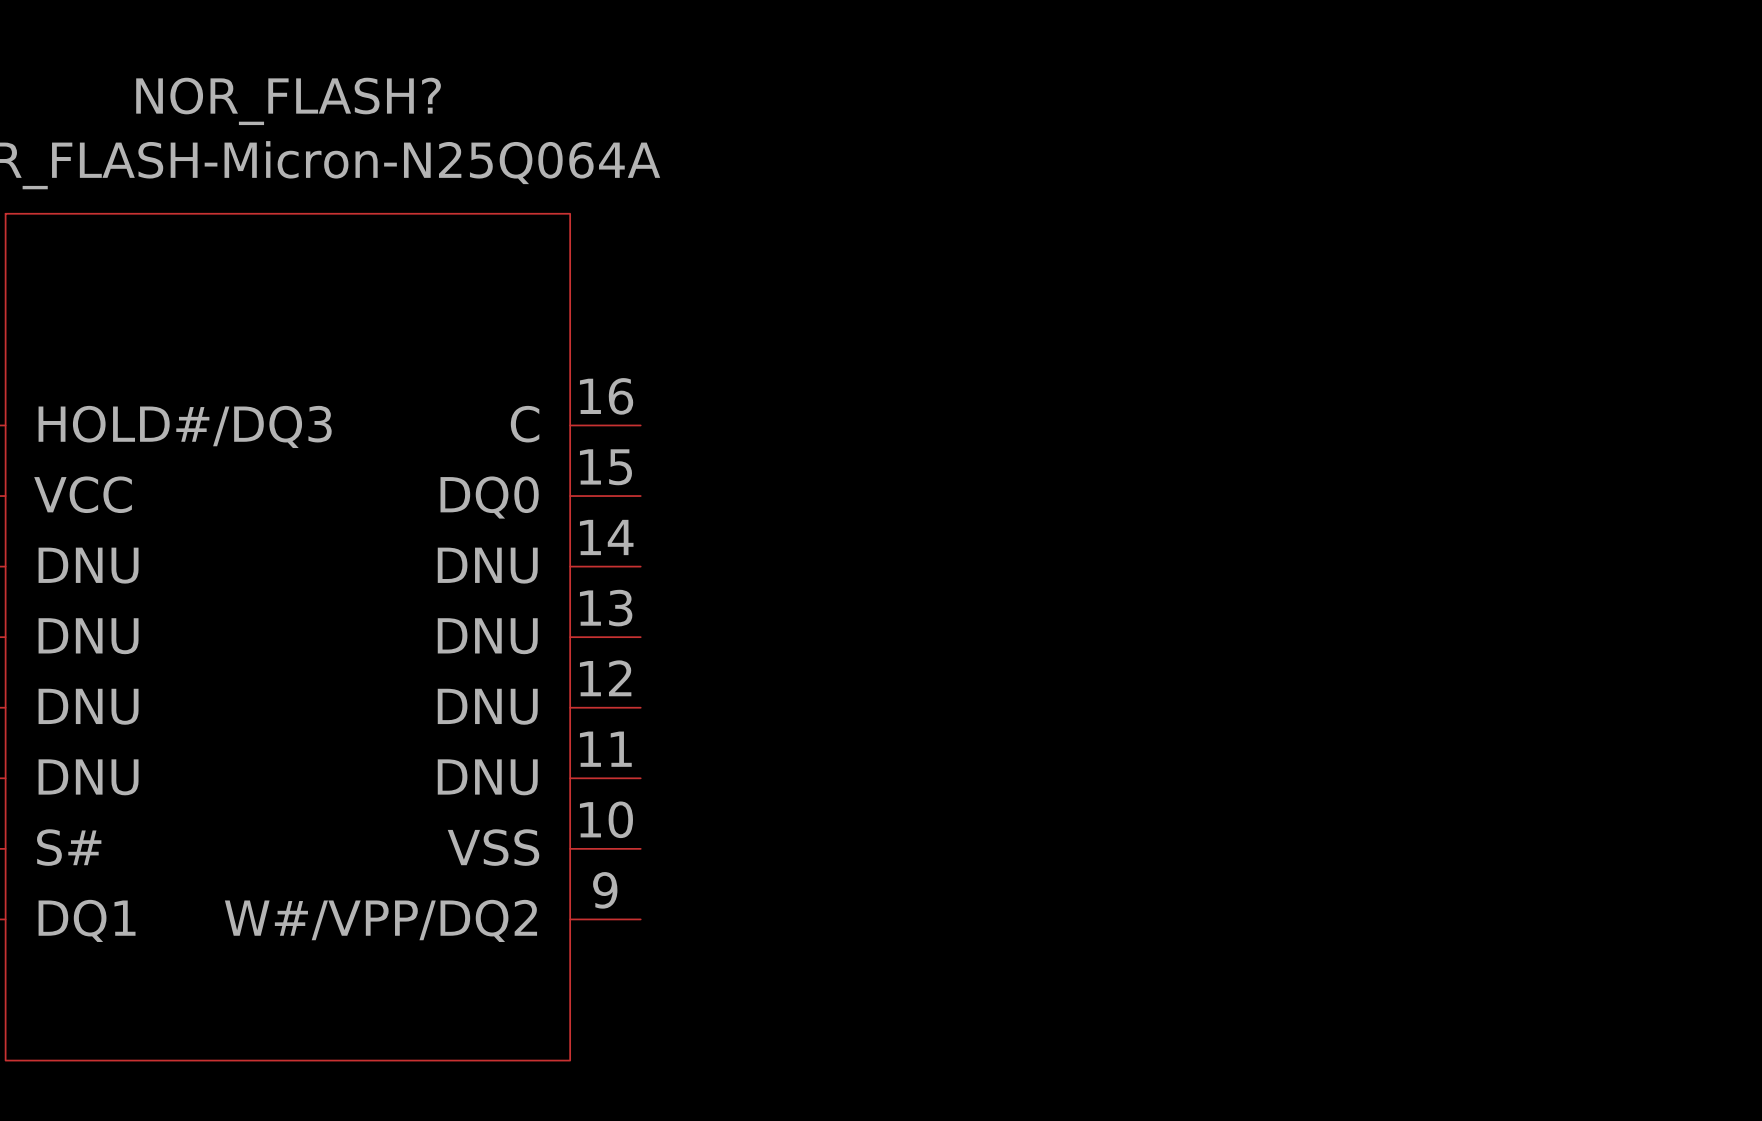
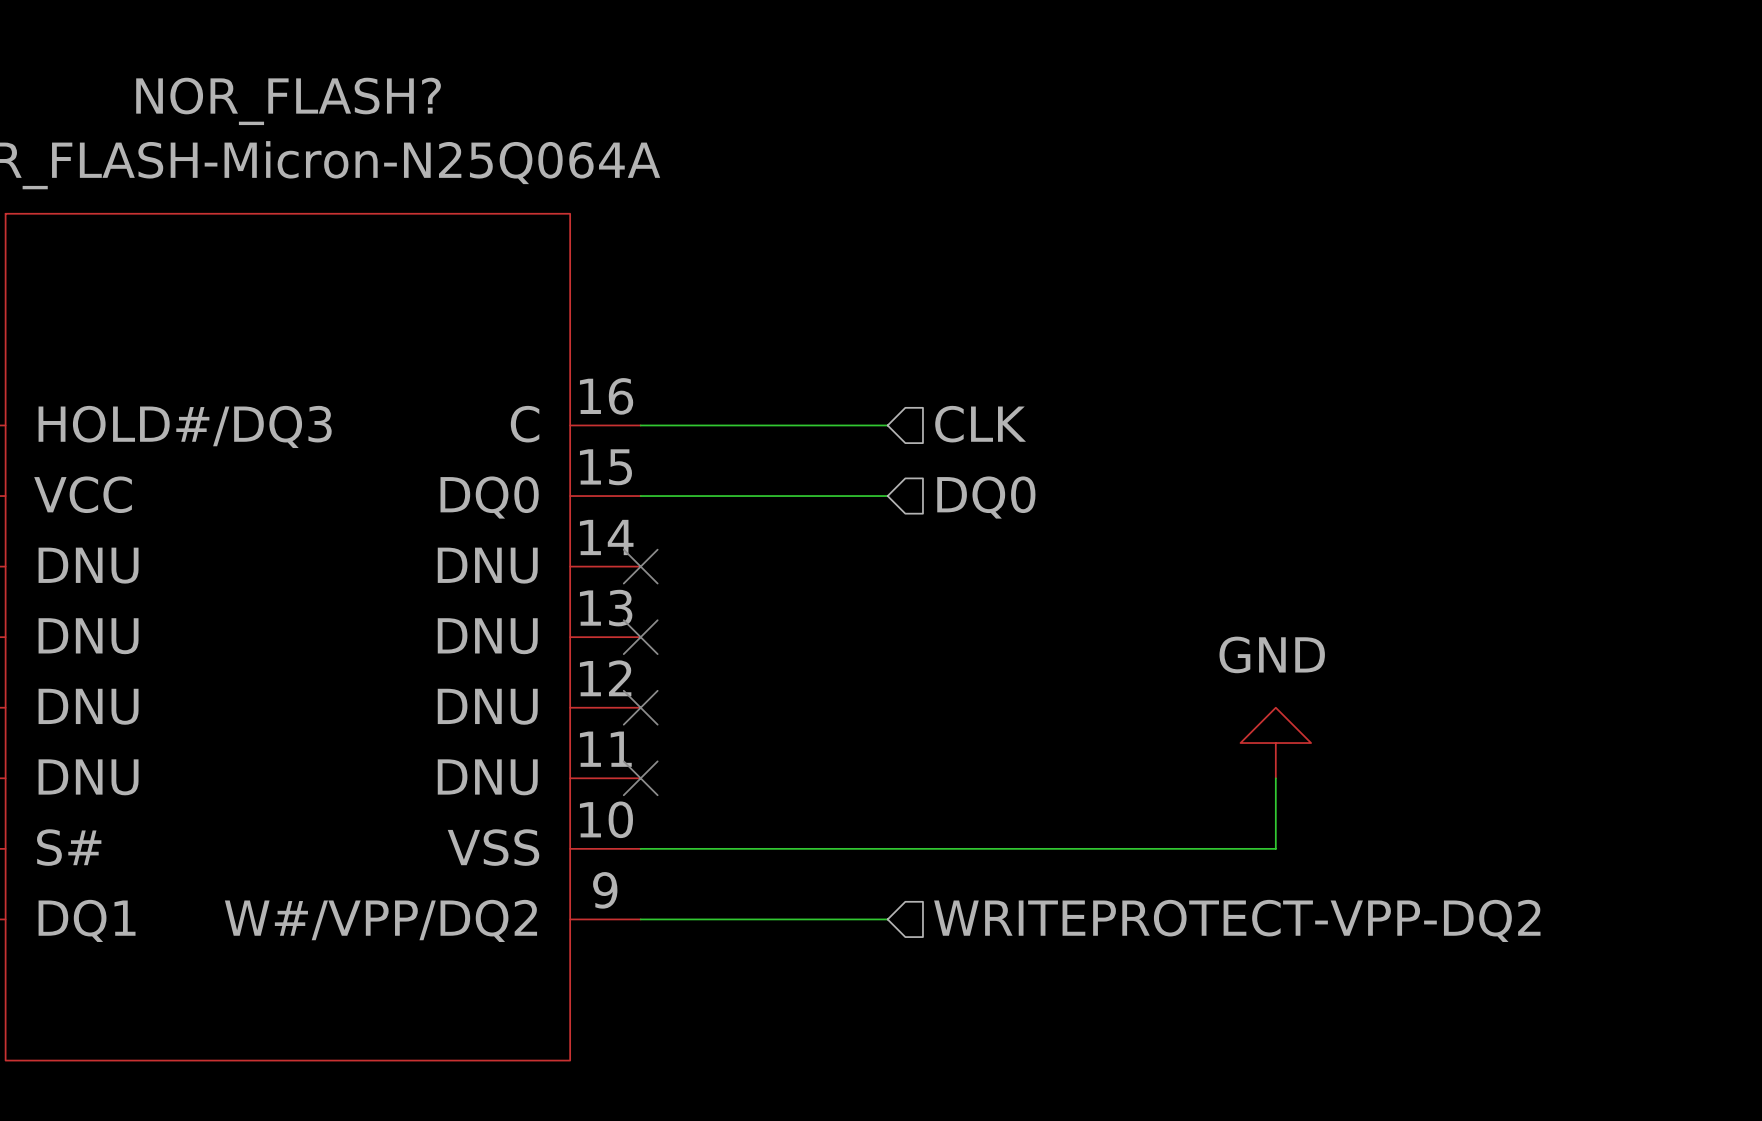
hierarchical label: none -> CLK (980, 424)
wire: none -> (640, 425) (887, 425)
wire: none -> (640, 496) (887, 496)
hierarchical label: none -> DQ0 (986, 497)
no-connect mark: none -> (640, 566)
no-connect mark: none -> (640, 637)
no-connect mark: none -> (640, 707)
power symbol: none -> GND (1275, 743)
no-connect mark: none -> (640, 778)
wire: none -> (1275, 778) (1275, 848) (640, 848)
wire: none -> (640, 919) (887, 919)
hierarchical label: none -> WRITEPROTECT-VPP-DQ2 (1237, 920)

